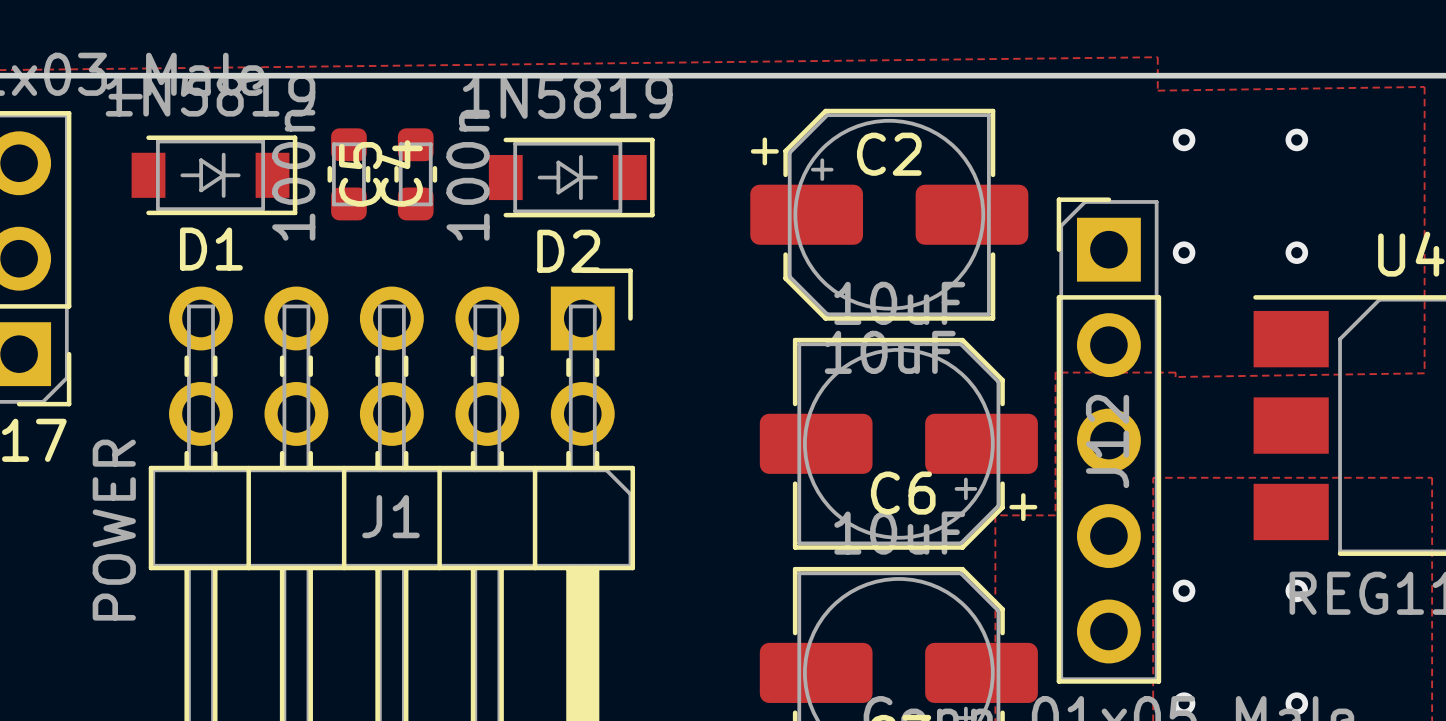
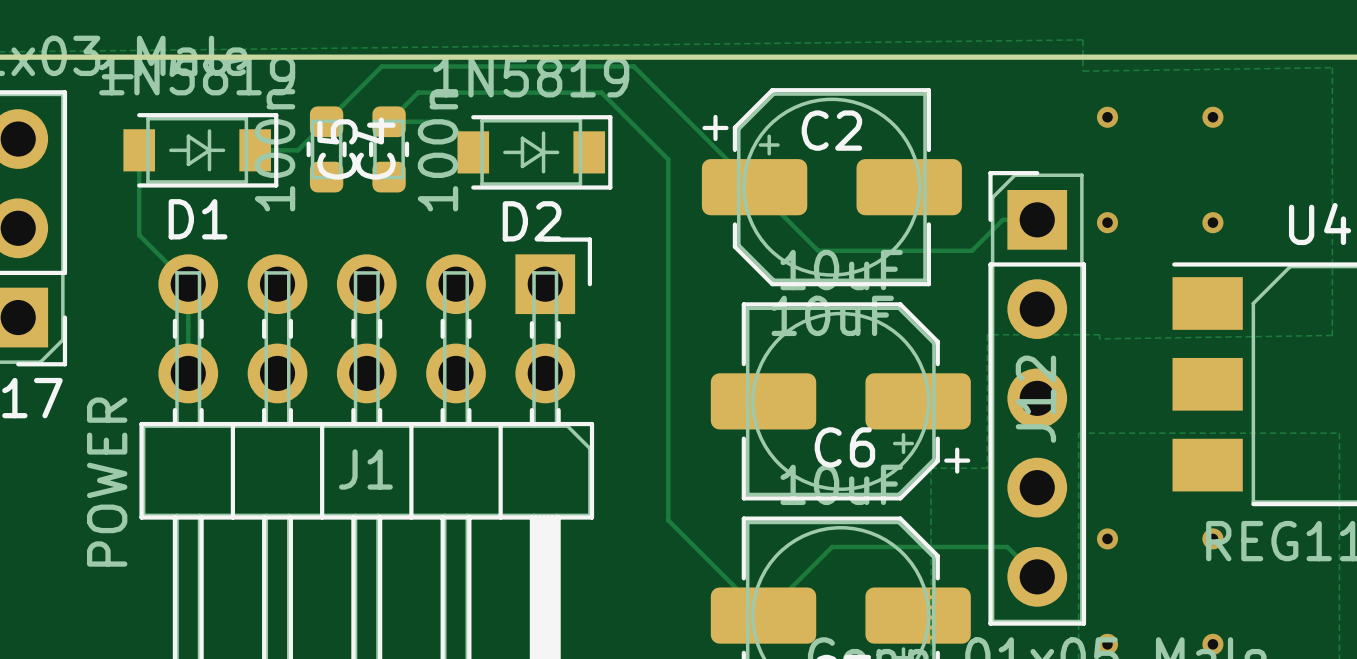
track: none -> (139, 150) (139, 235) (188, 284) (188, 373)
track: none -> (255, 150) (298, 150) (381, 66) (633, 66) (818, 250) (971, 250) (1002, 219) (1037, 219)
track: none -> (473, 152) (473, 147) (447, 121) (389, 121) (418, 92) (601, 92) (668, 159) (668, 520) (763, 615) (832, 546) (1007, 546) (1037, 576)

